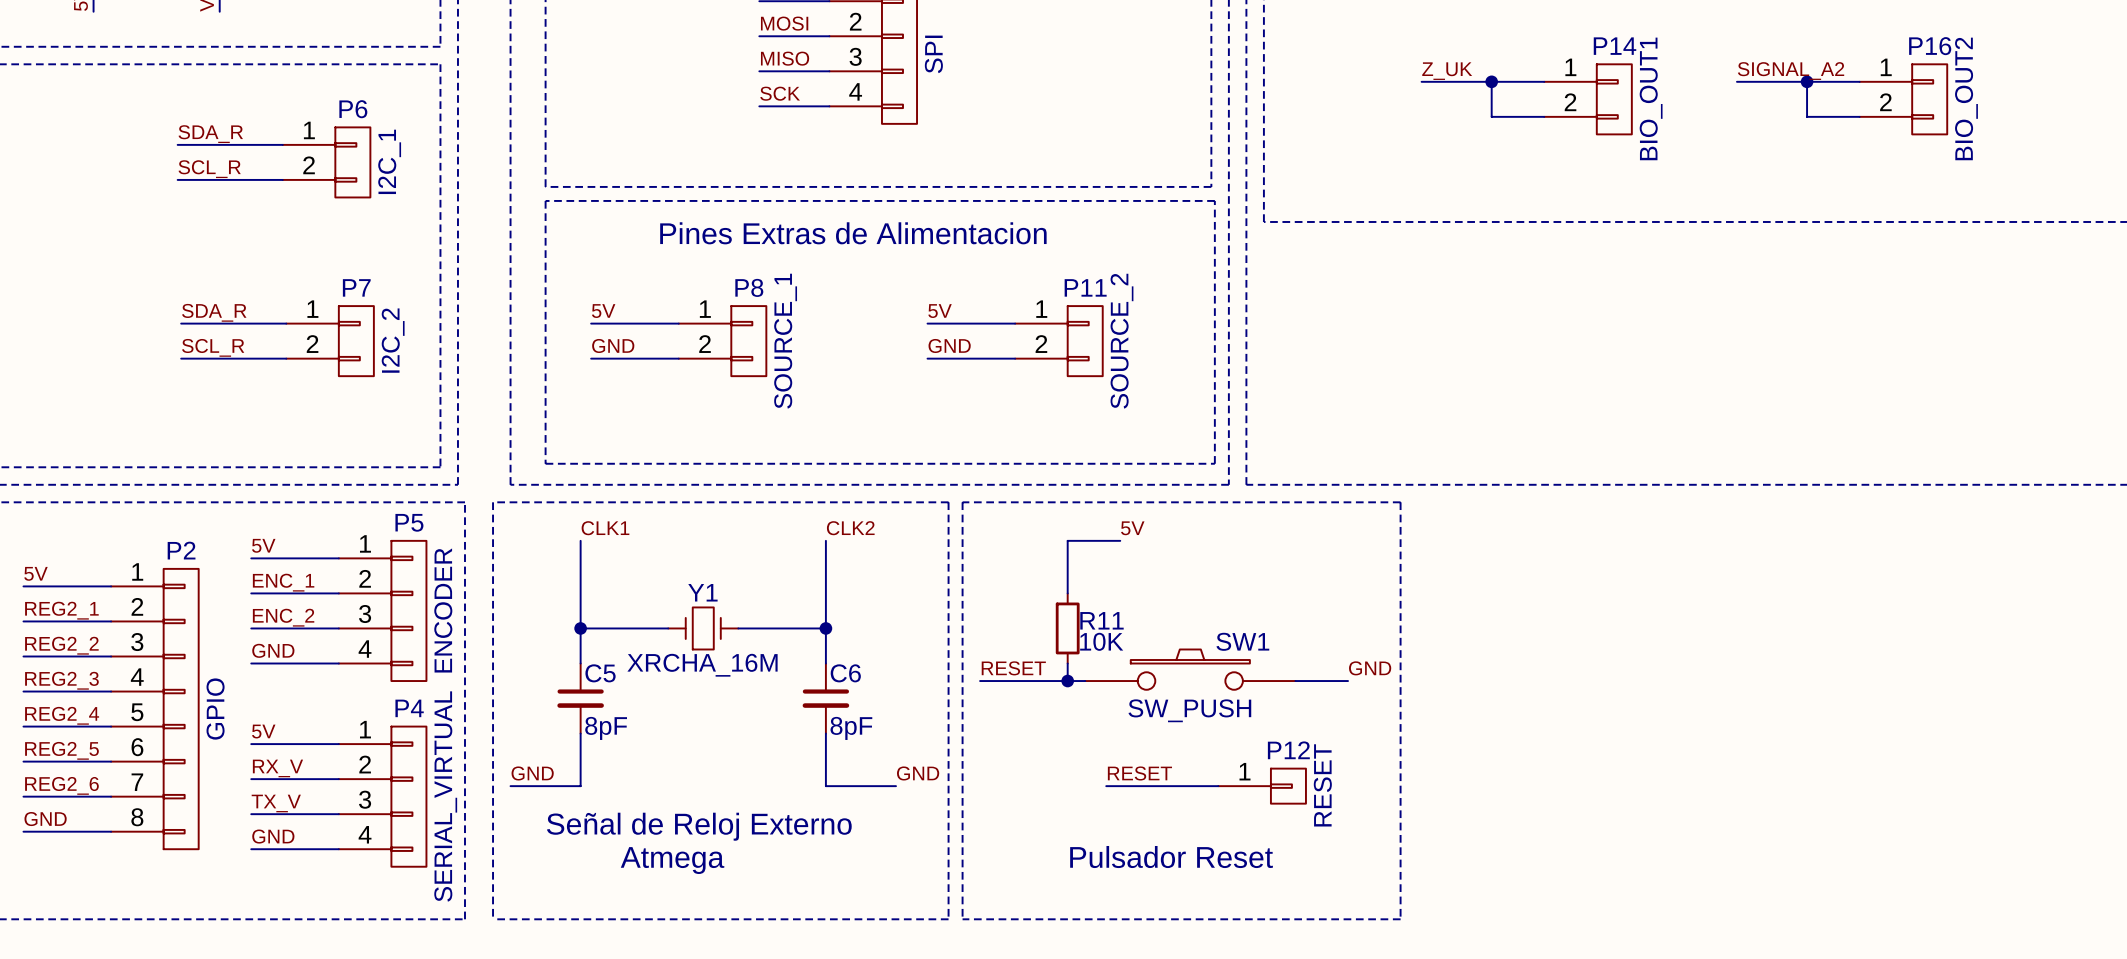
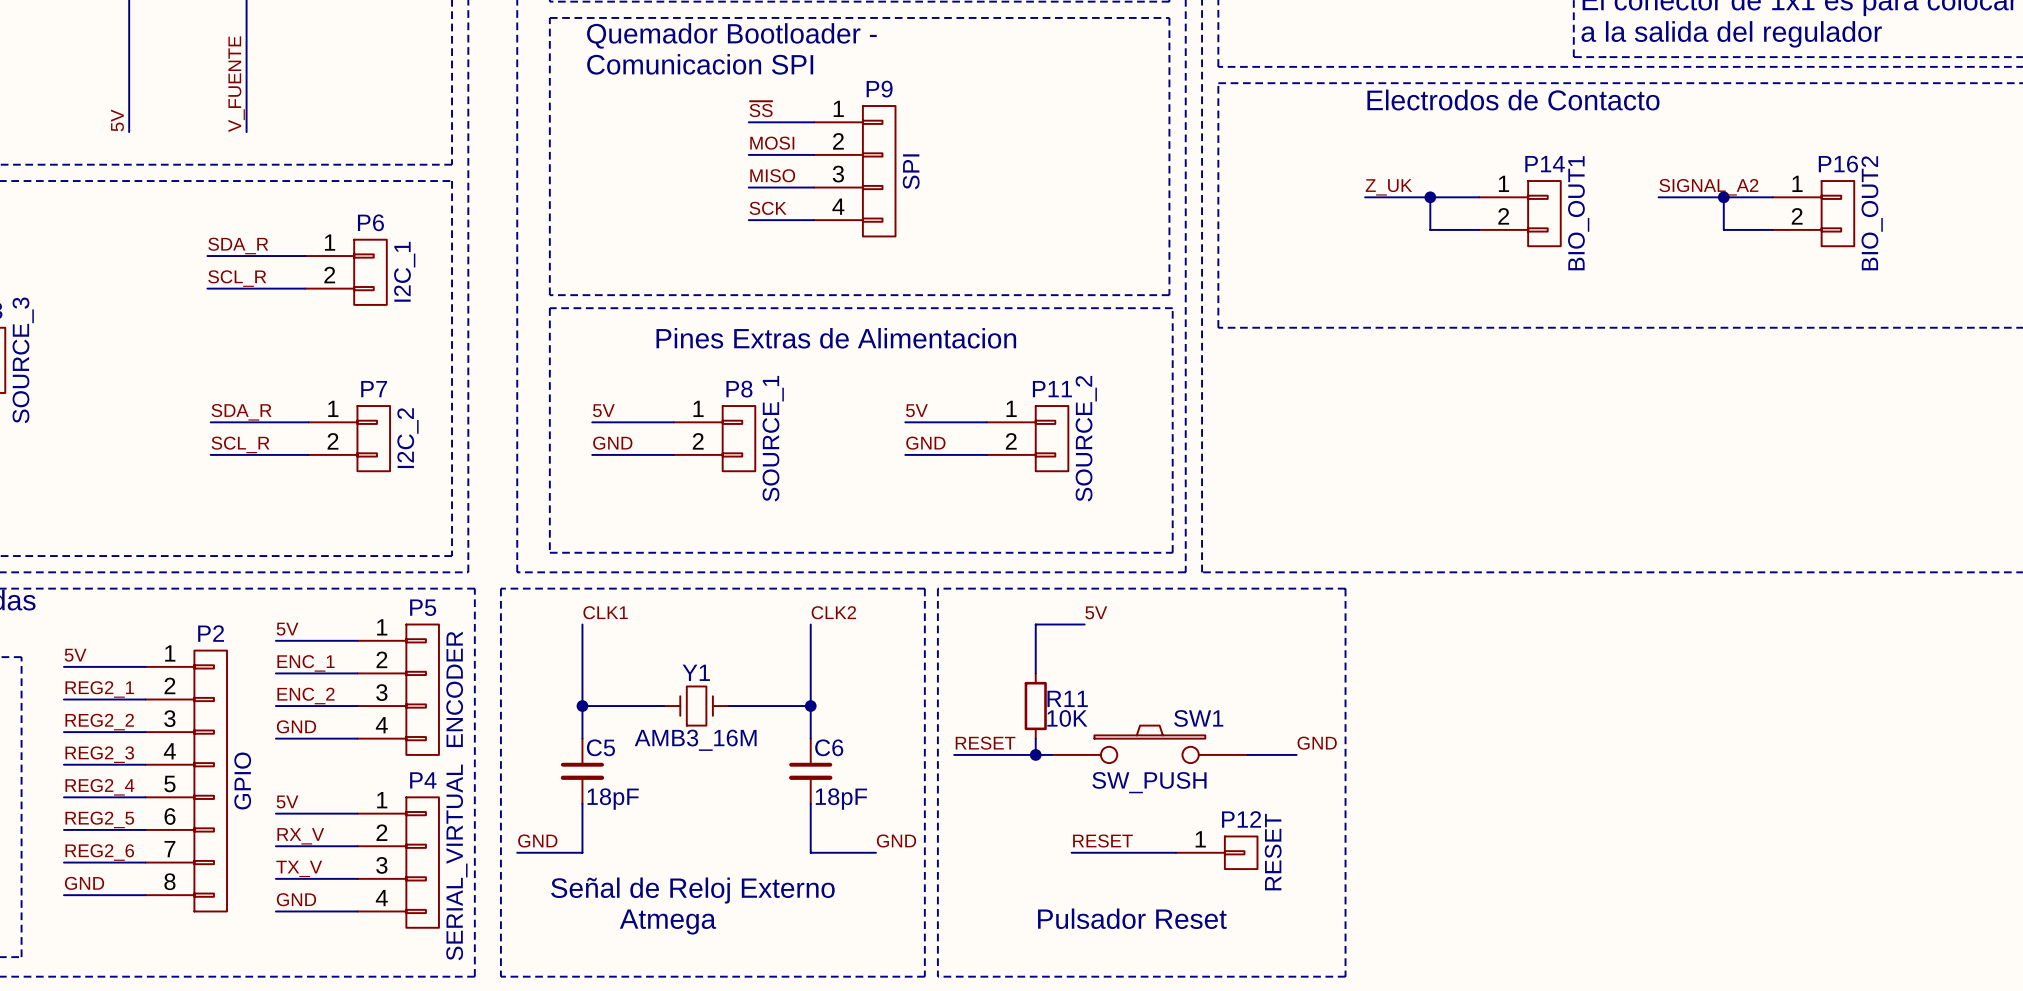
Y1 value: XRCHA_16M (702, 665) -> AMB3_16M (695, 740)
C5 value: 8pF (606, 728) -> 18pF (613, 799)
C6 value: 8pF (851, 728) -> 18pF (841, 799)

